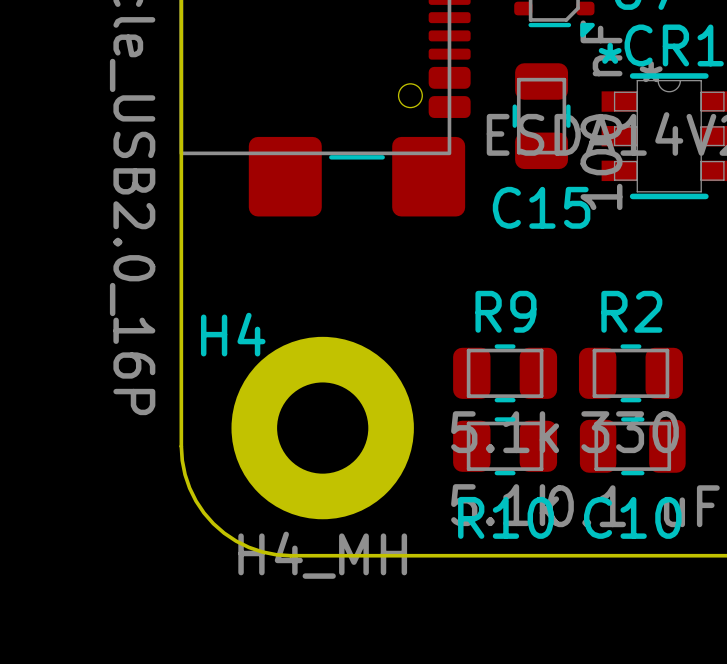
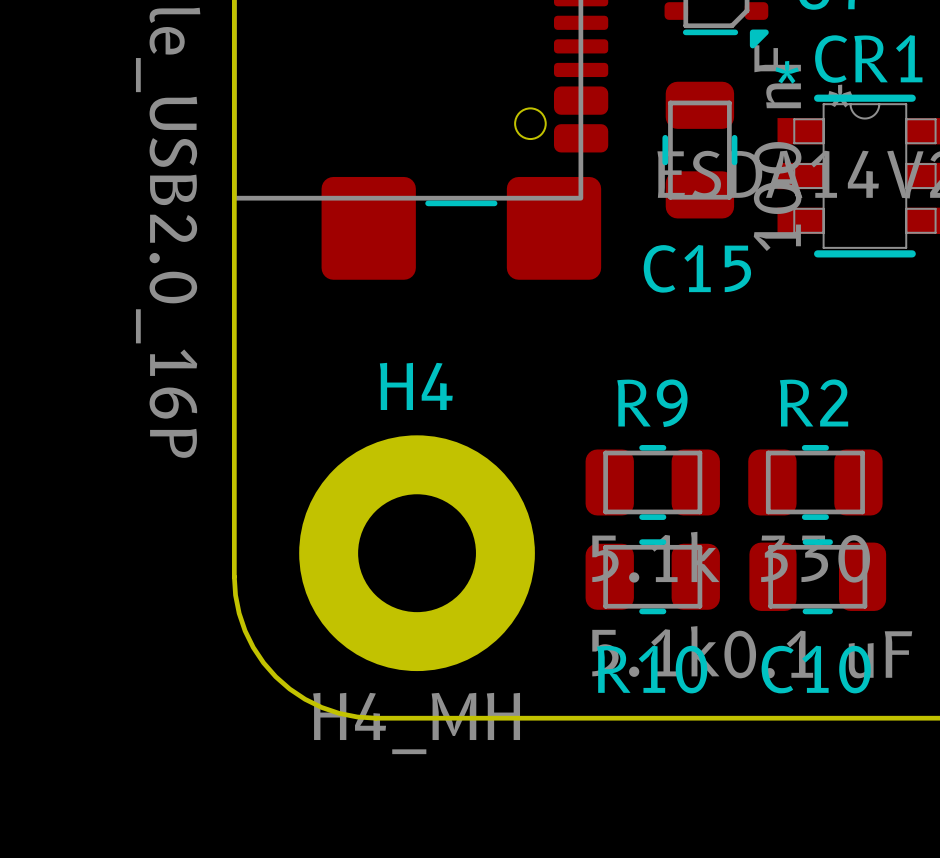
H4 name position: H4 (233, 334) -> H4 (416, 386)

